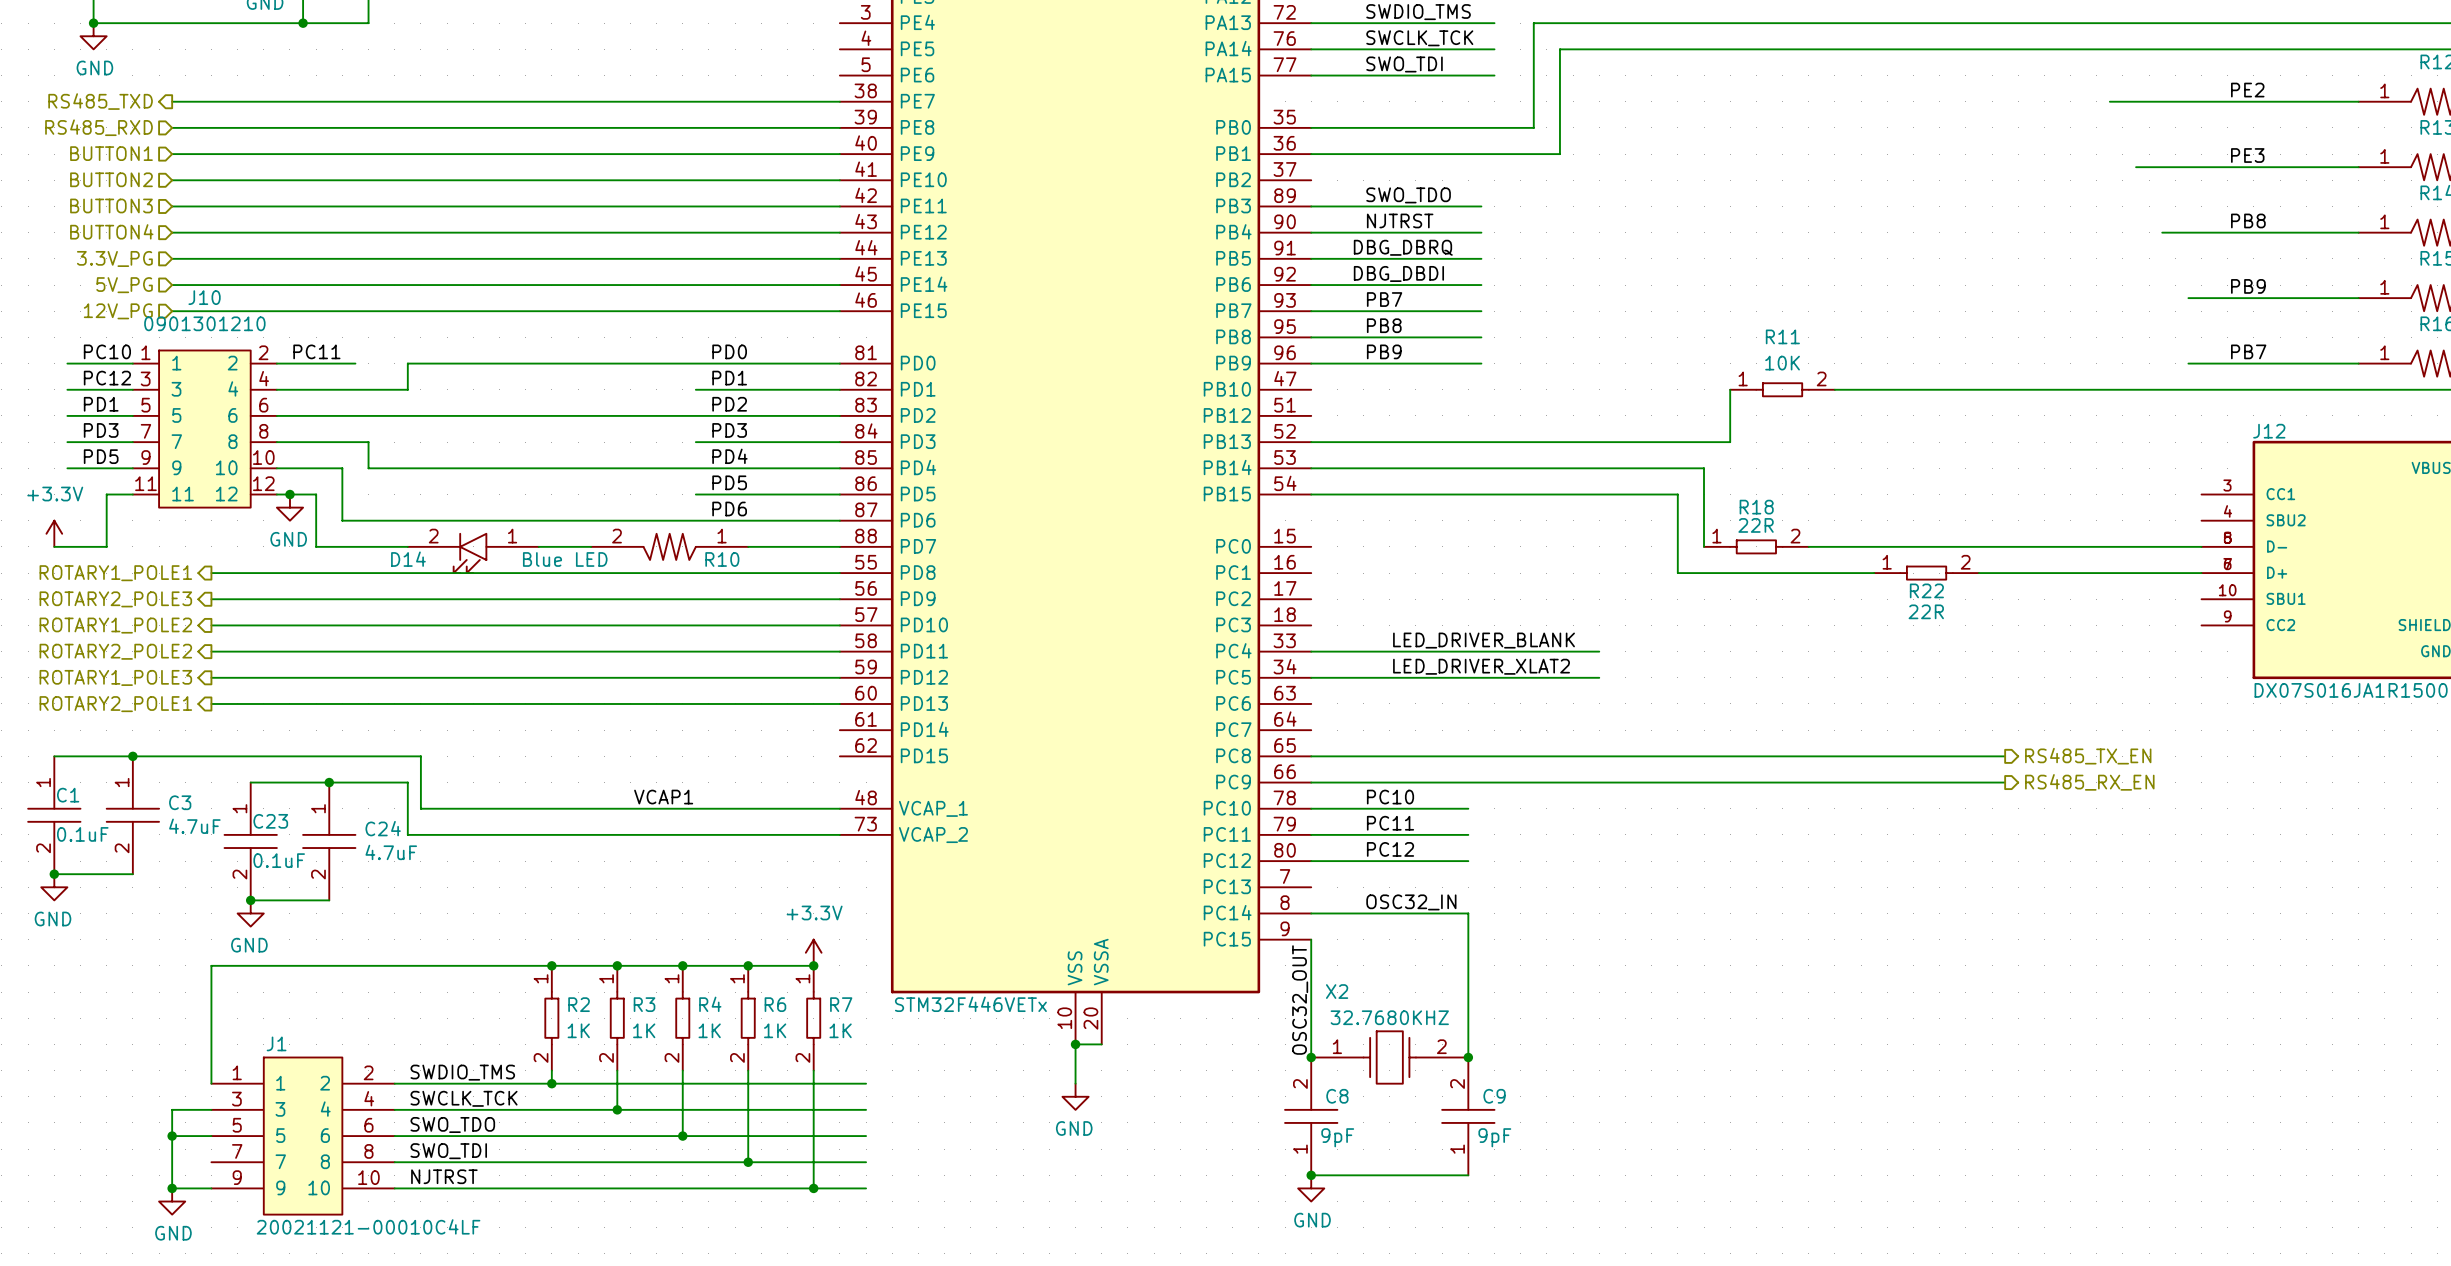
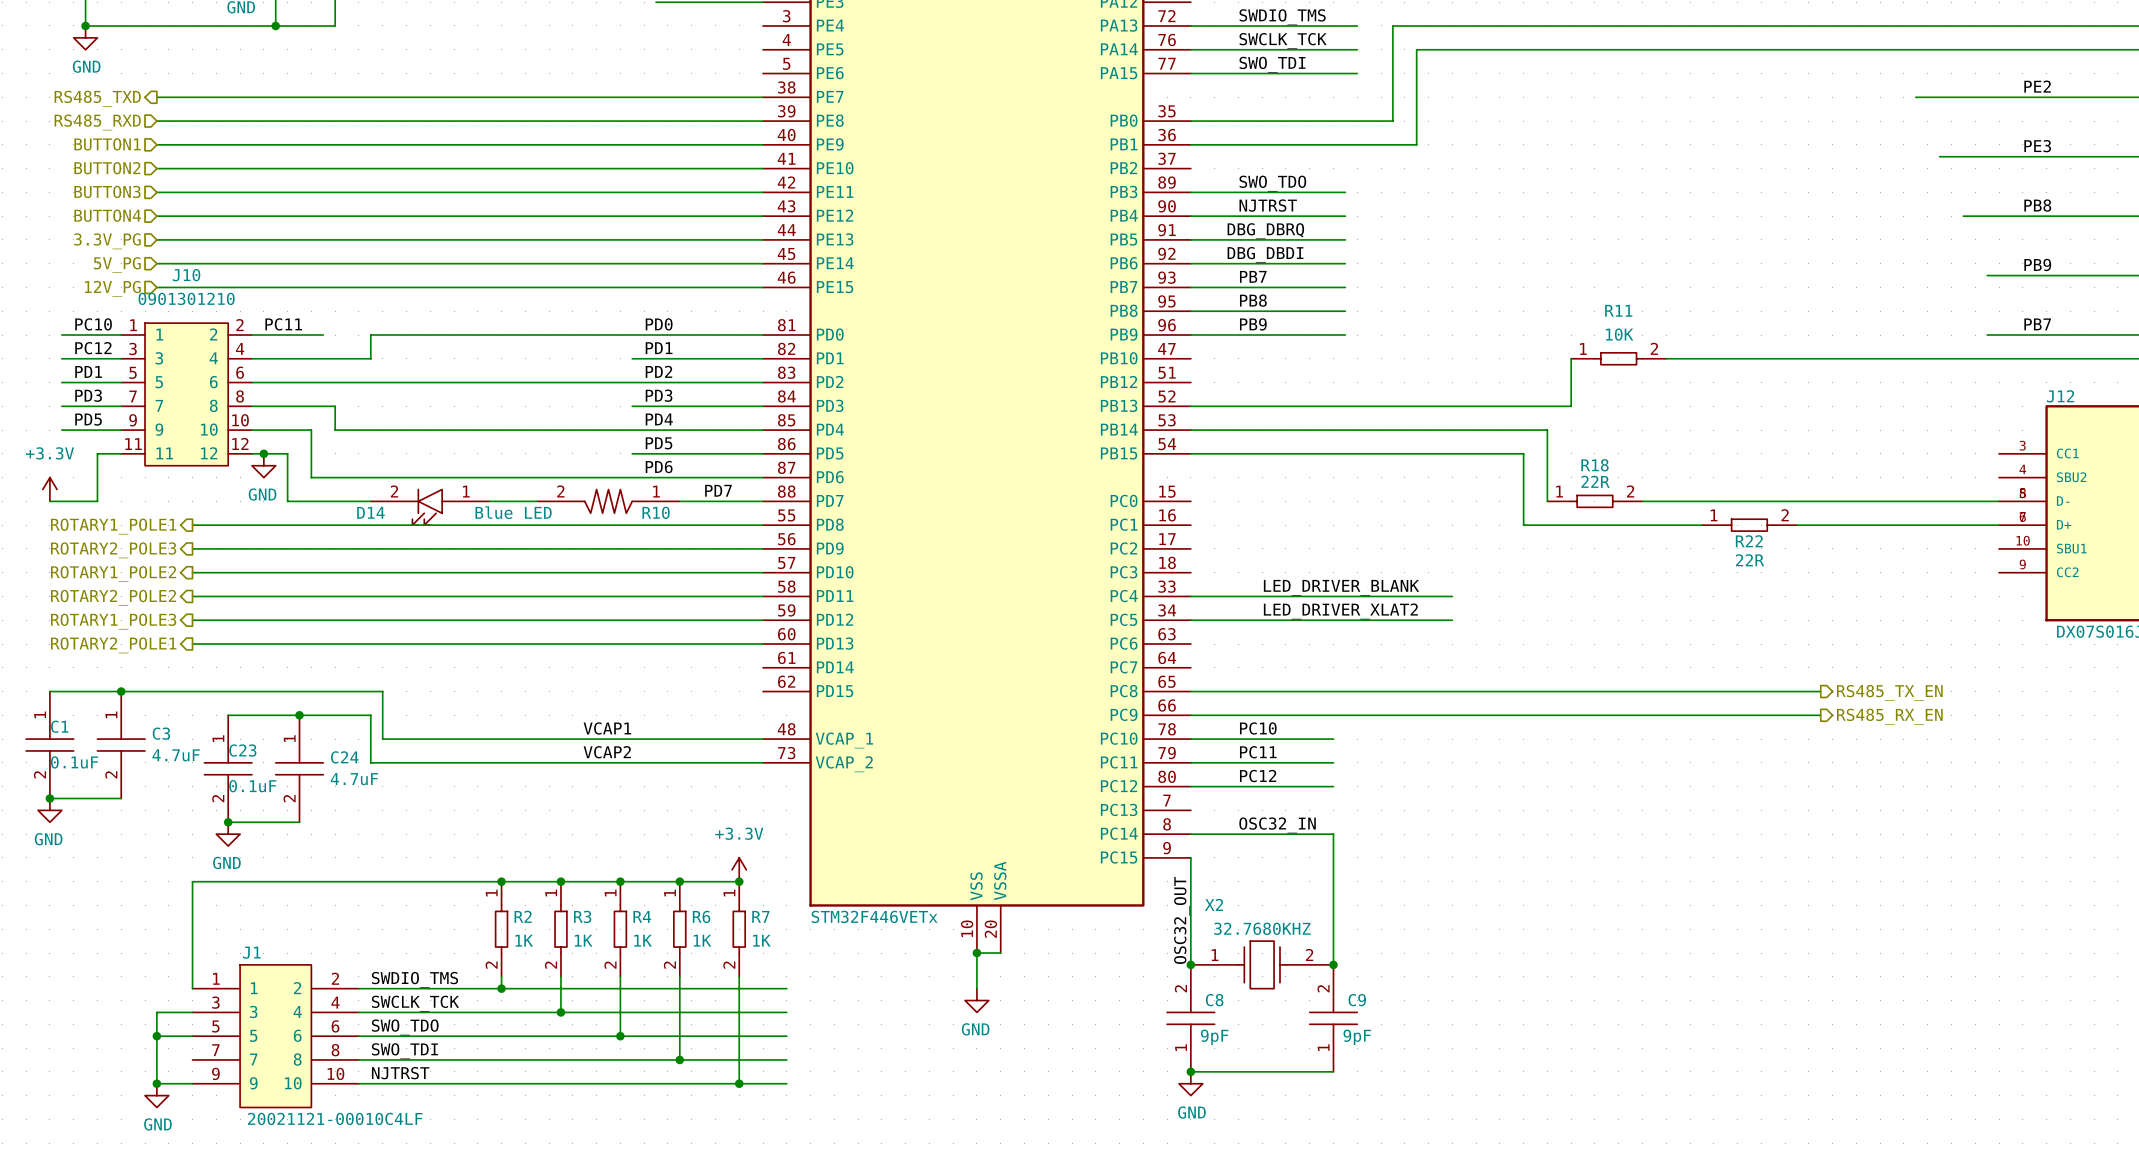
label: none -> PD7 (718, 490)
label: none -> VCAP2 (607, 752)

